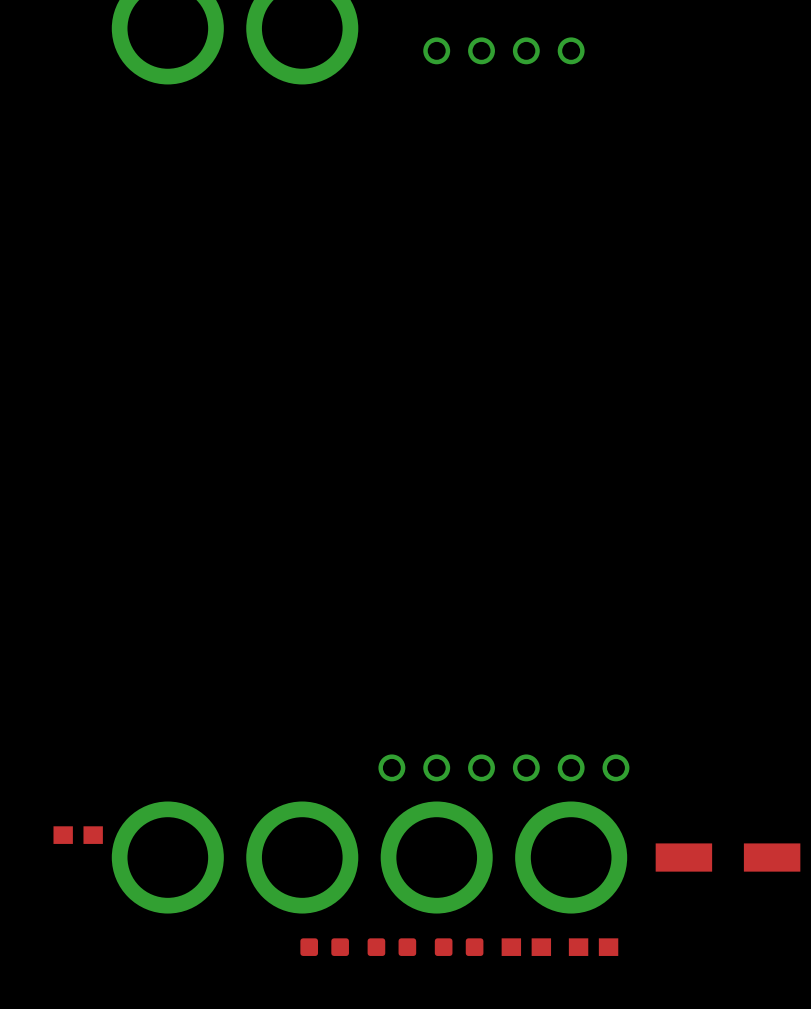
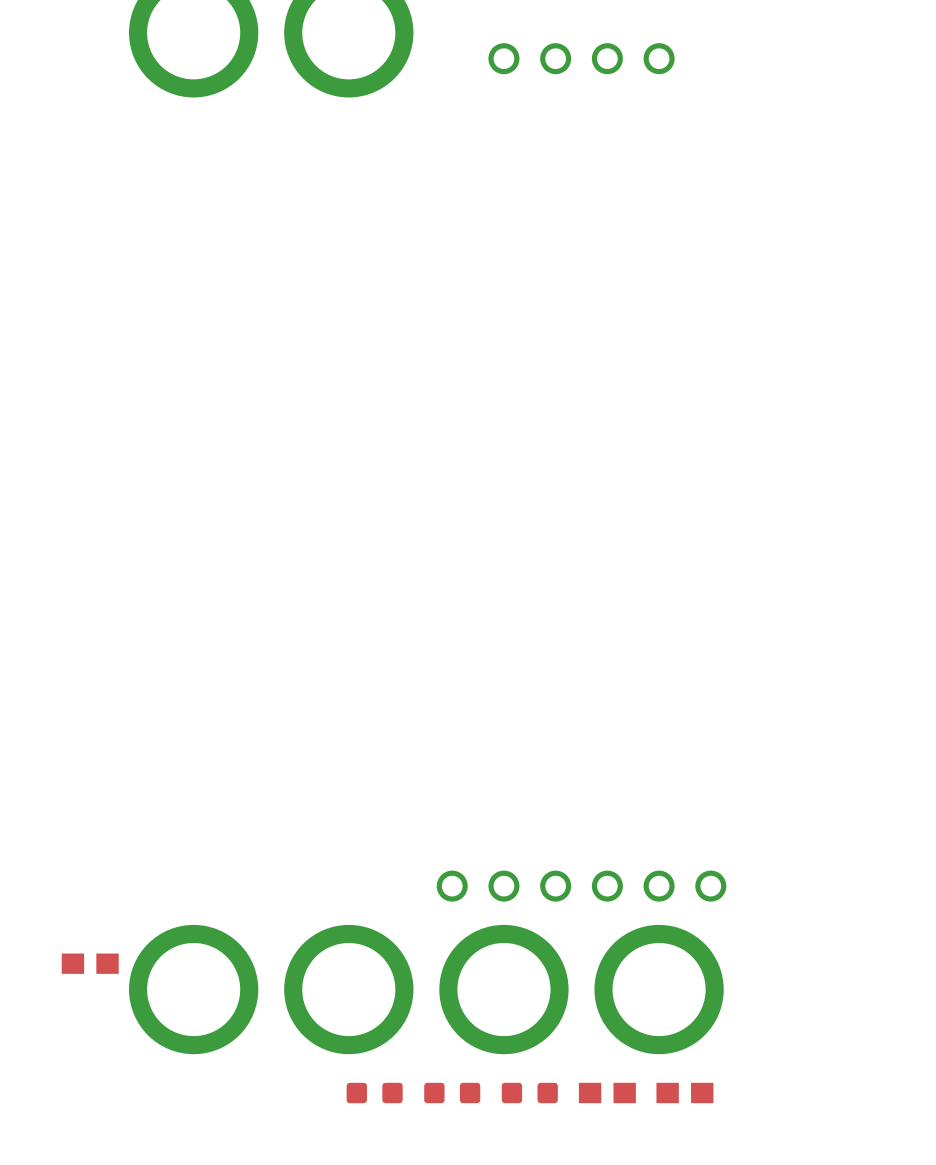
part: (728, 857) -> none

